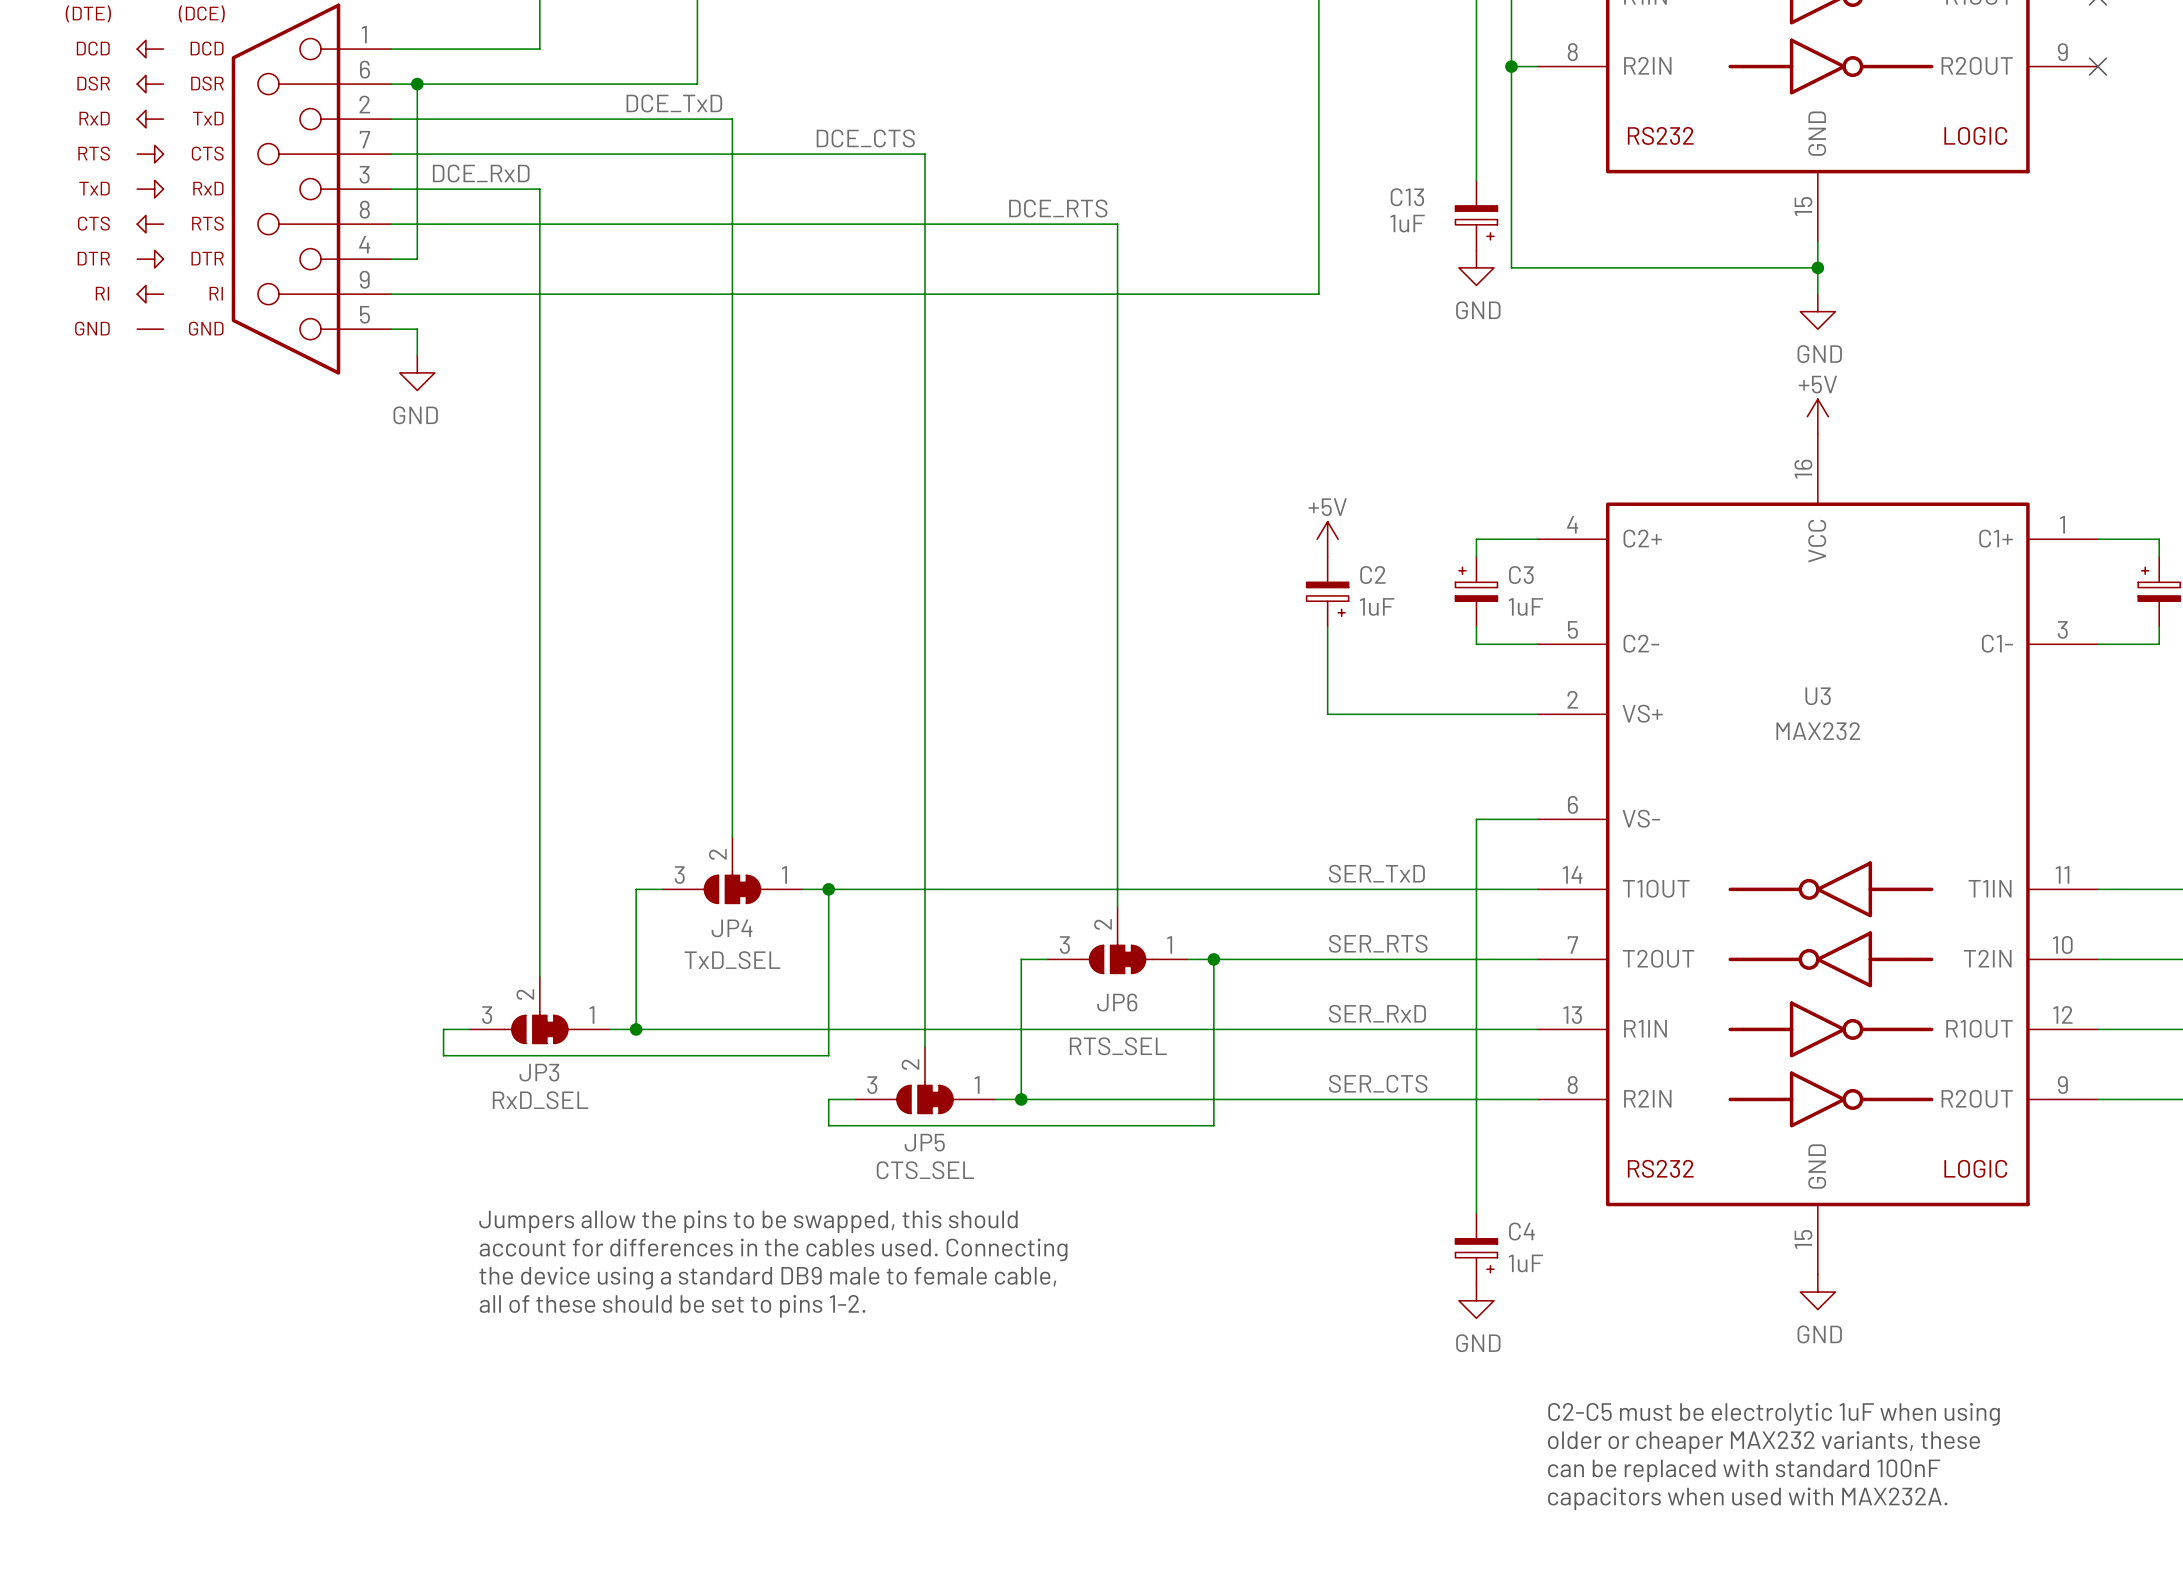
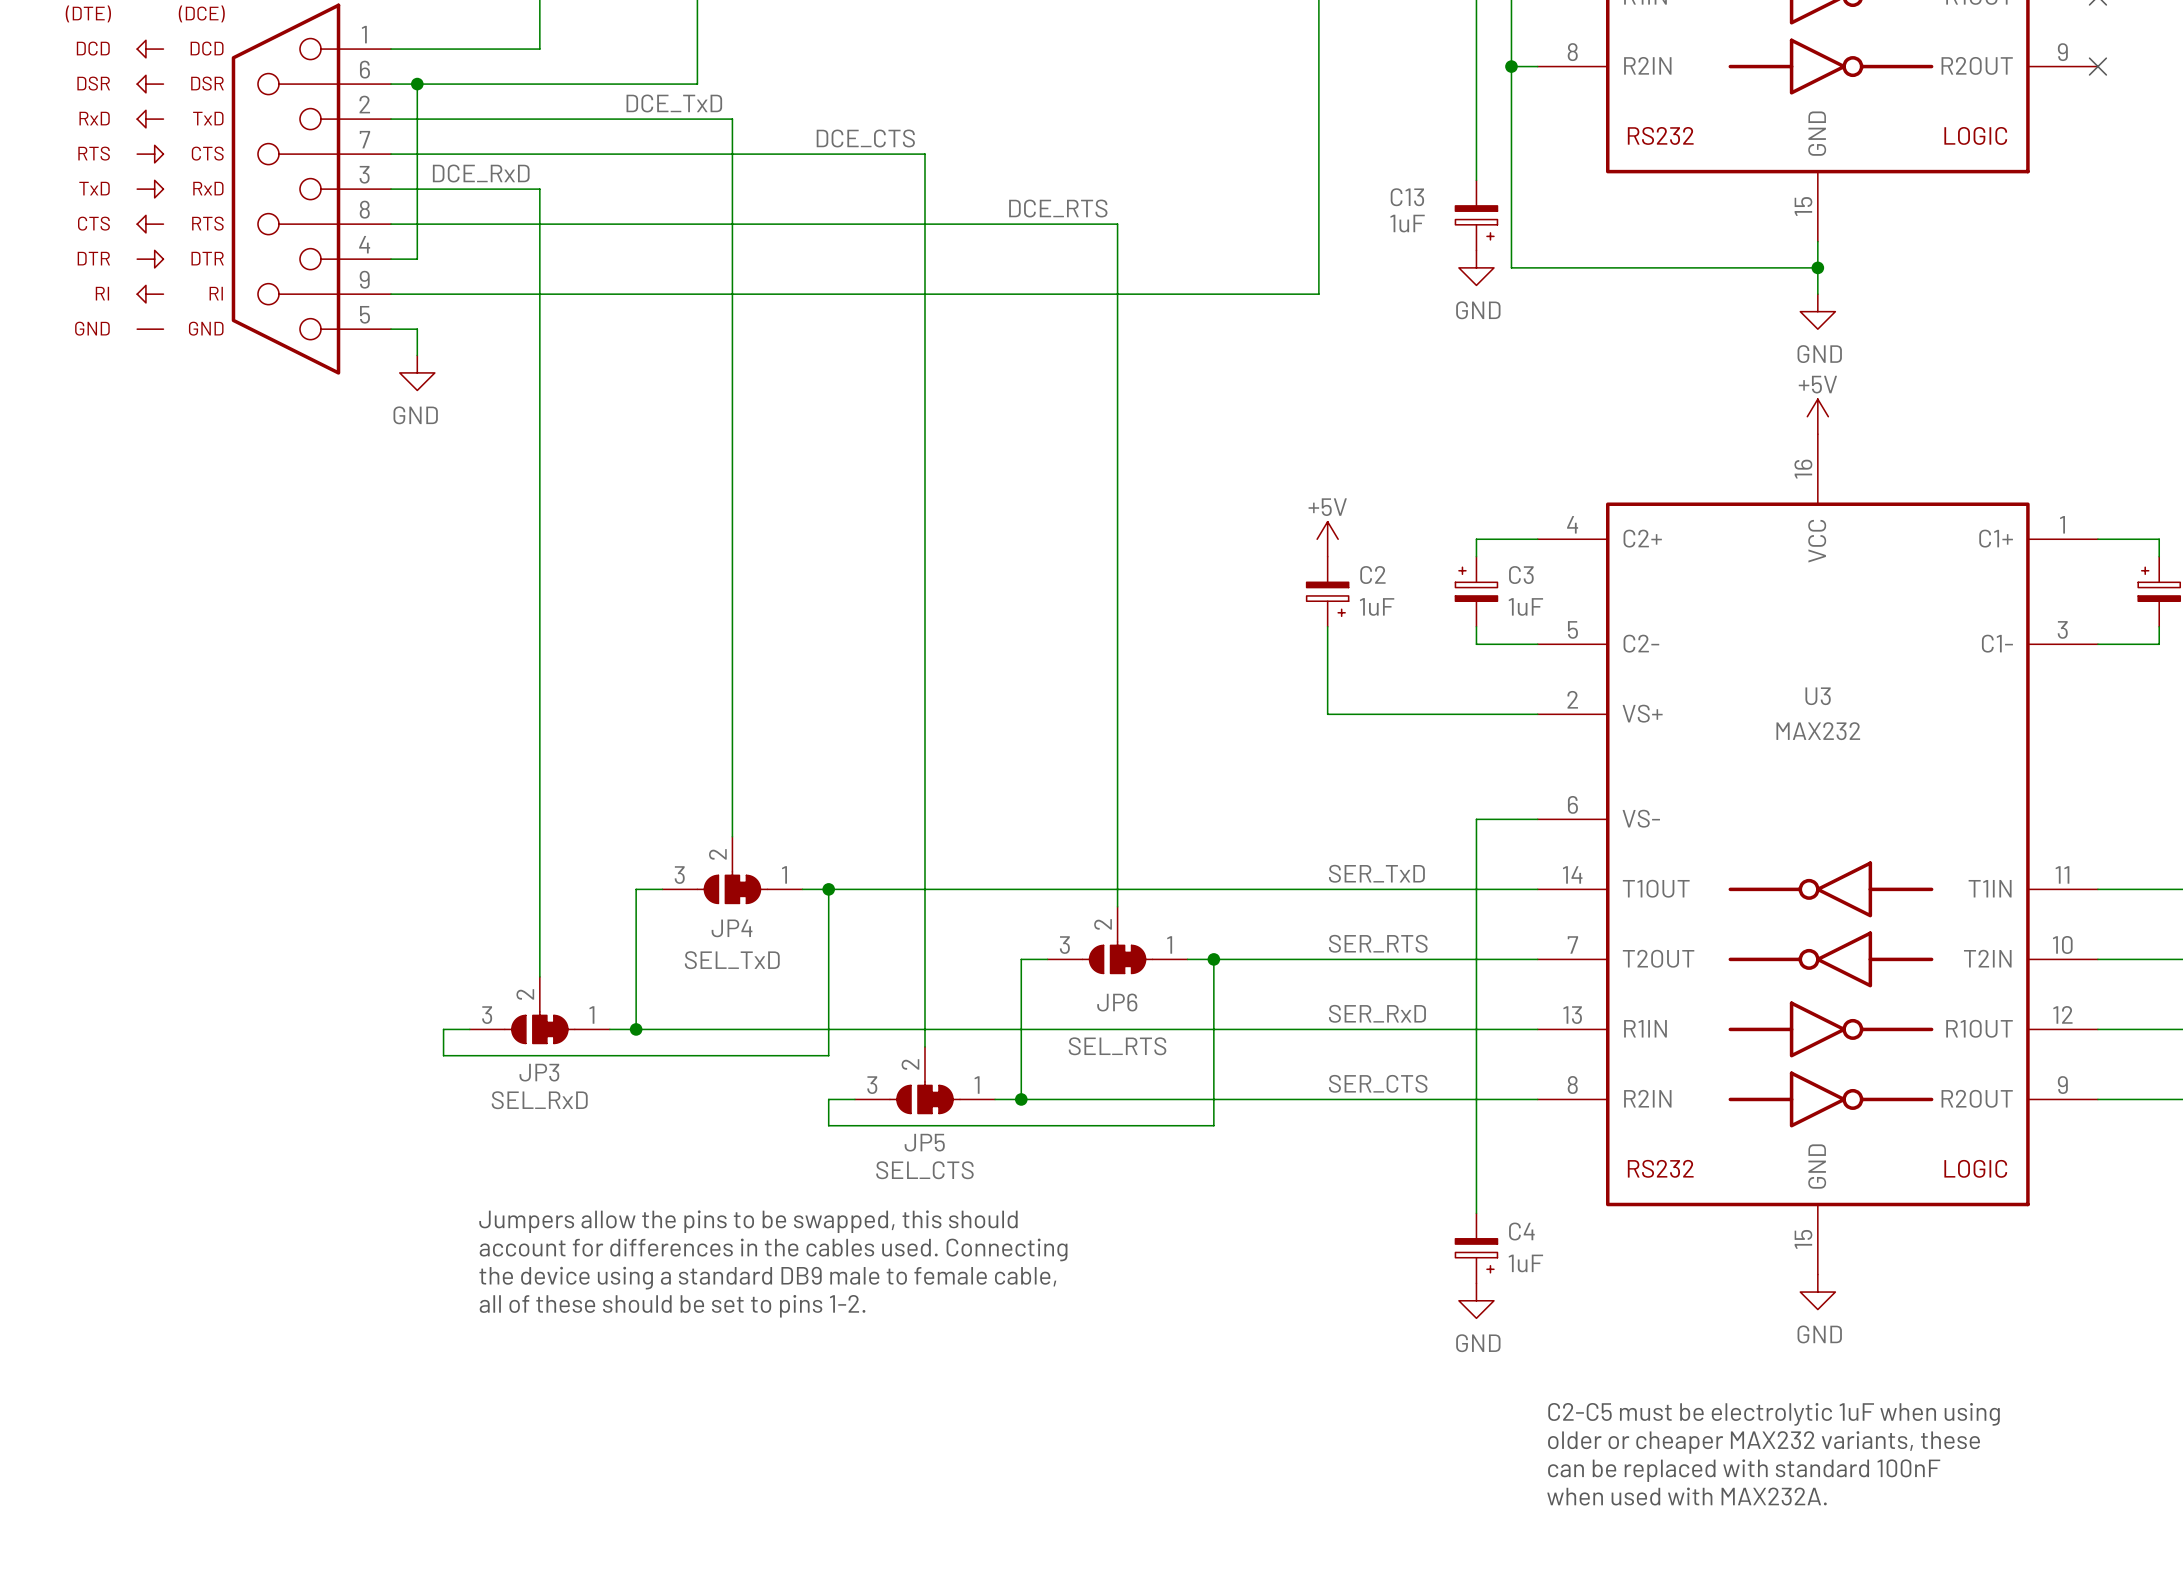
JP4 value: TxD_SEL (732, 960) -> SEL_TxD (732, 960)
JP6 value: RTS_SEL (1118, 1046) -> SEL_RTS (1117, 1046)
JP3 value: RxD_SEL (540, 1100) -> SEL_RxD (539, 1100)
JP5 value: CTS_SEL (925, 1170) -> SEL_CTS (924, 1170)
text: capacitors when used with MAX232A. (1747, 1498) -> when used with MAX232A. (1686, 1496)

